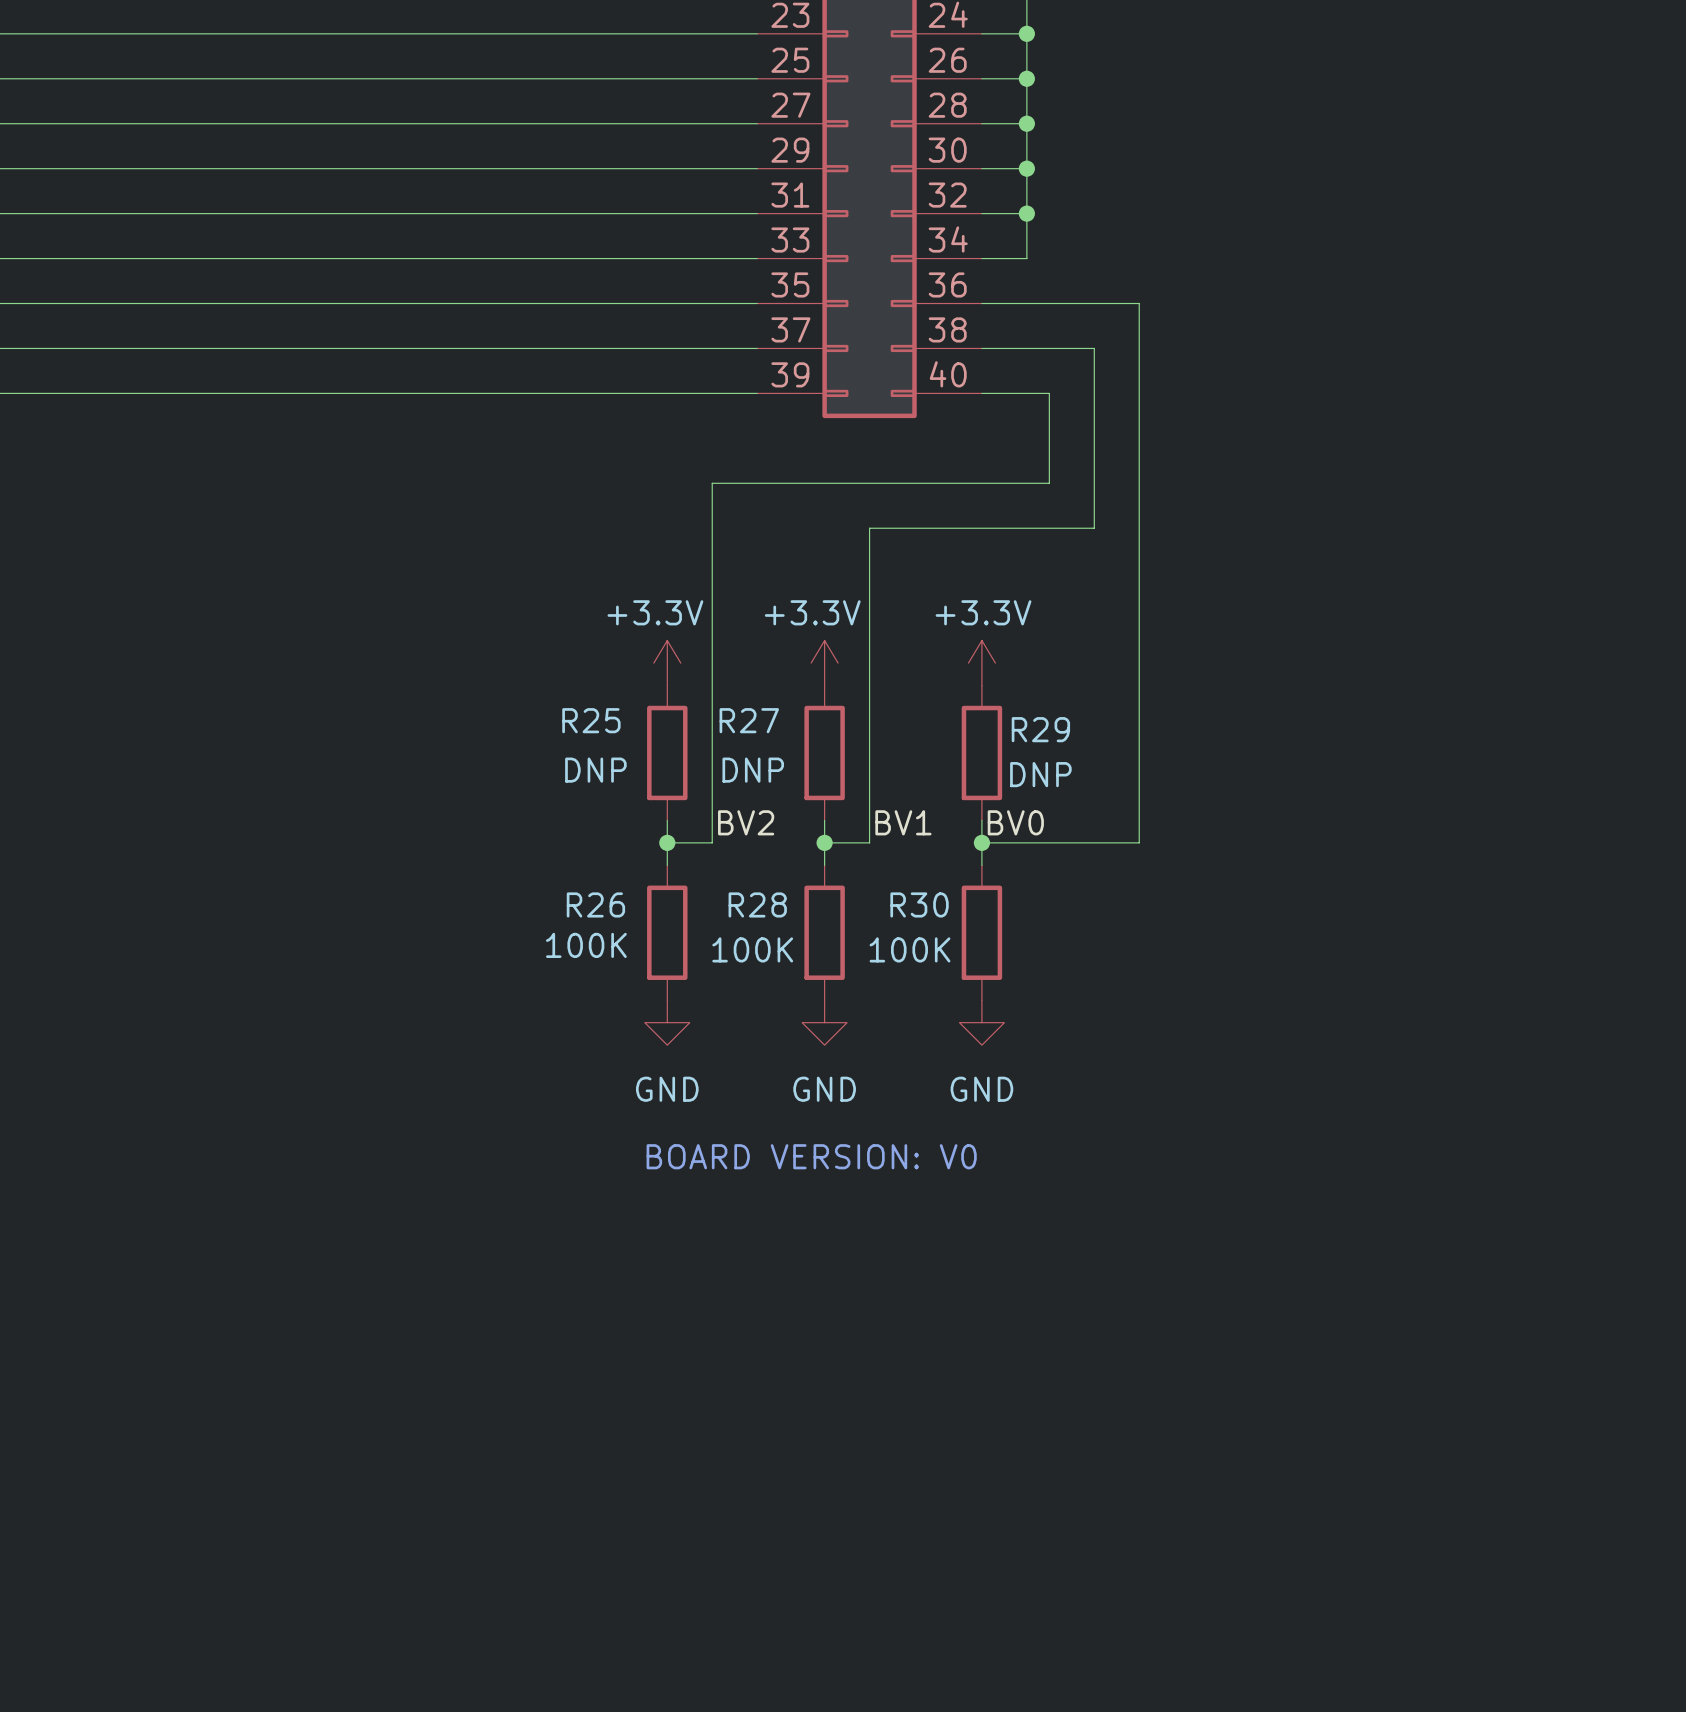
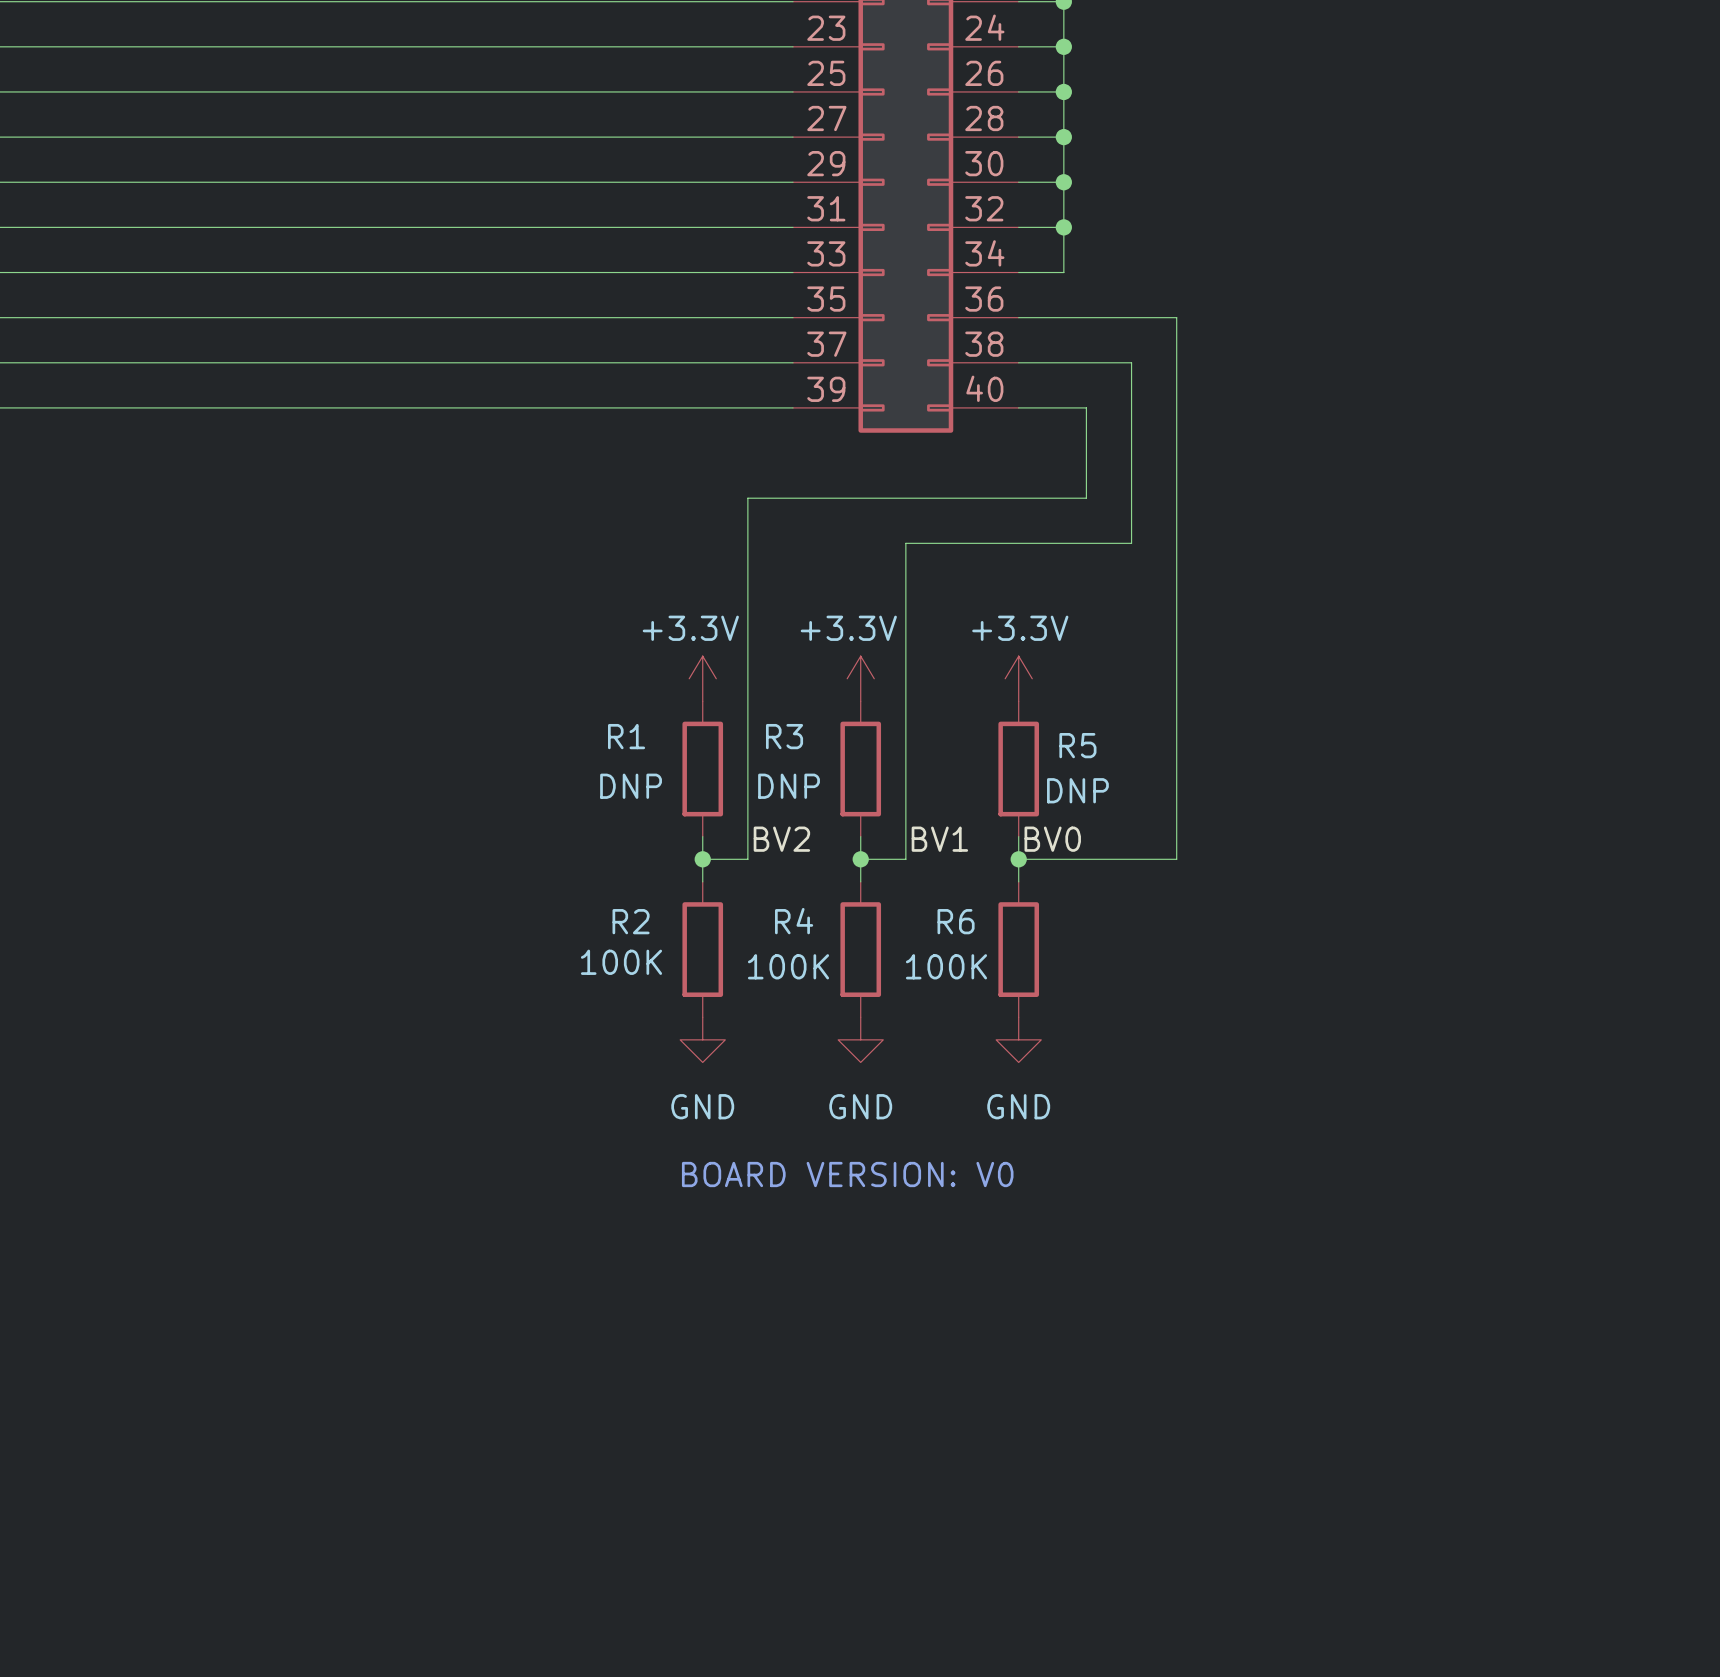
R25 name: R25 (591, 720) -> R1 (626, 736)
R27 name: R27 (749, 720) -> R3 (784, 736)
R29 name: R29 (1040, 729) -> R5 (1077, 745)
R26 name: R26 (595, 904) -> R2 (631, 921)
R28 name: R28 (757, 904) -> R4 (794, 921)
R30 name: R30 (919, 904) -> R6 (956, 921)

